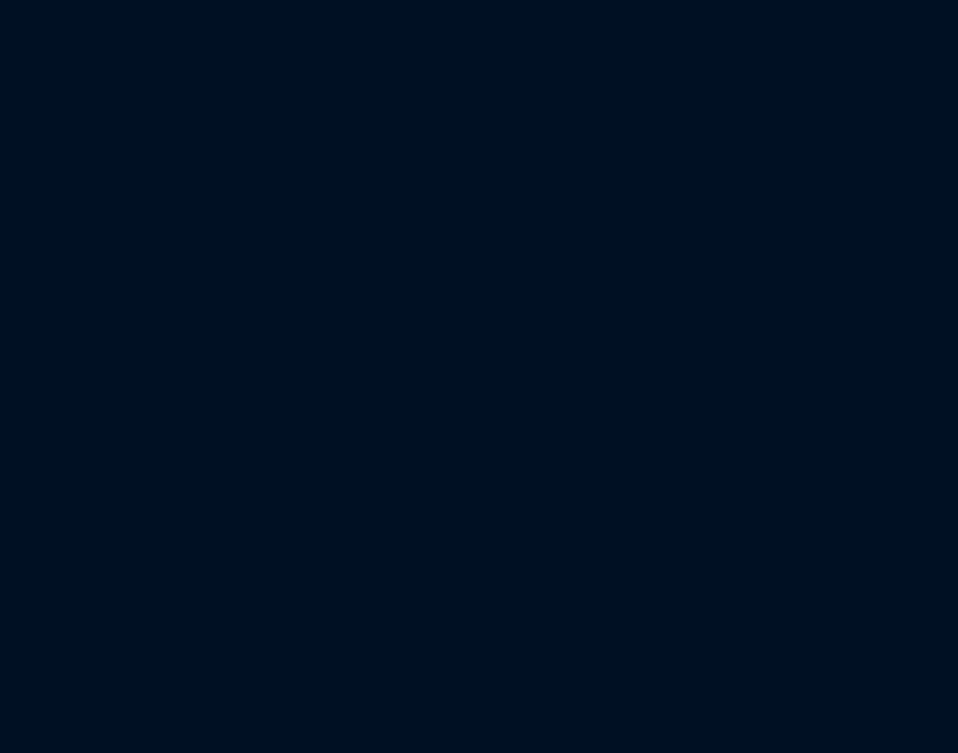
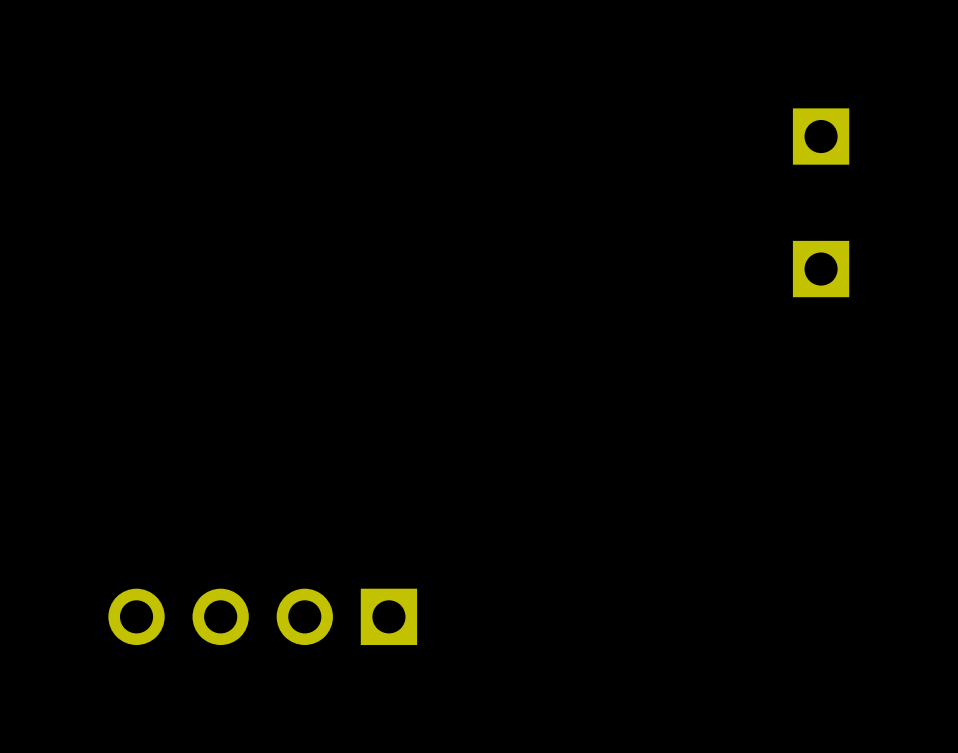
part: none -> (821, 136)
part: none -> (821, 269)
part: none -> (262, 616)

